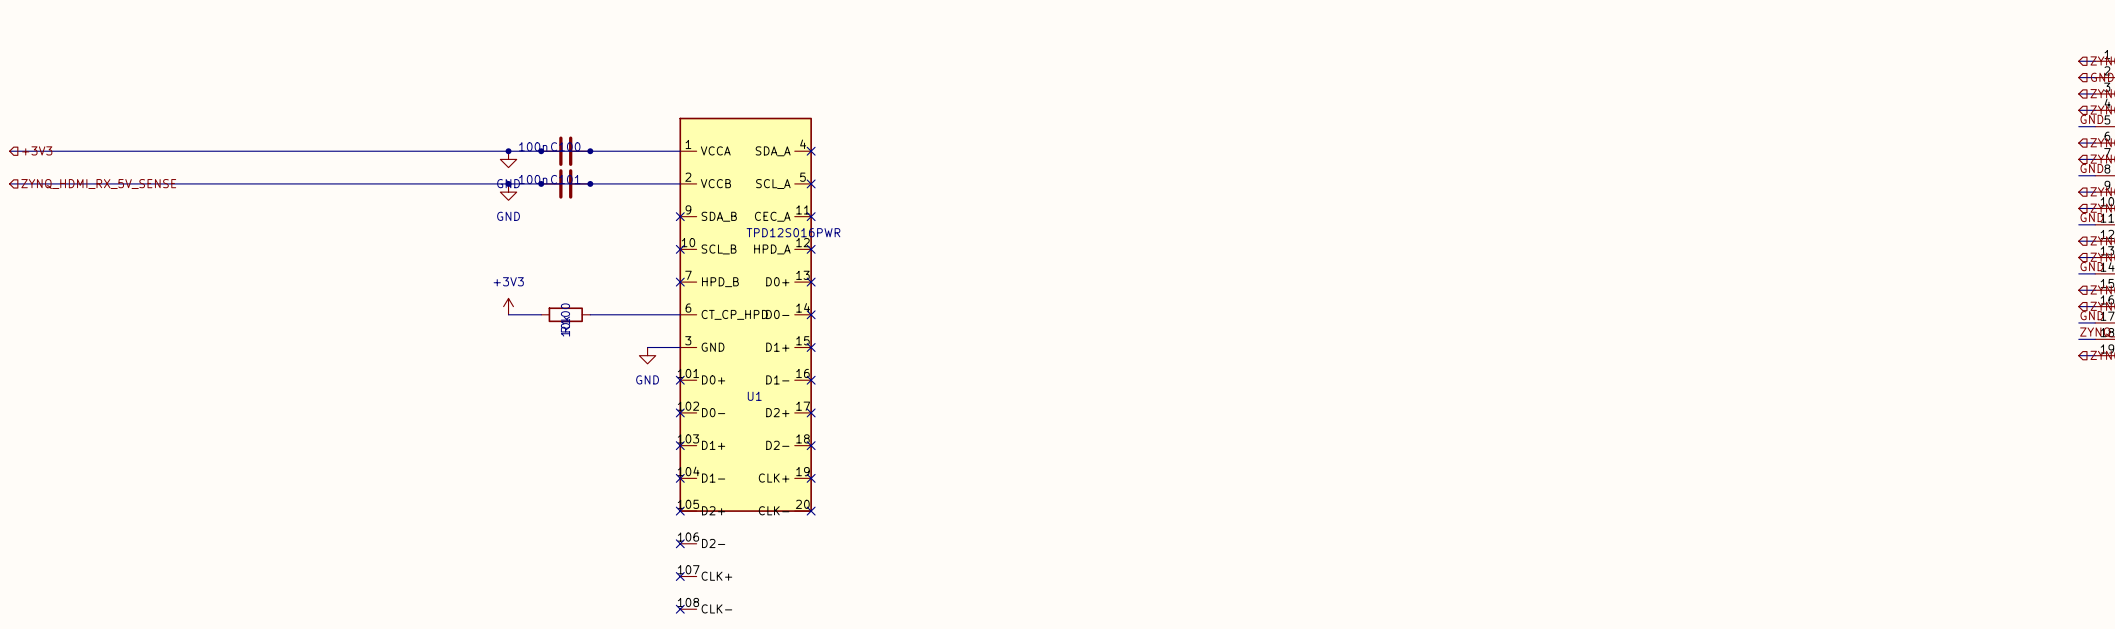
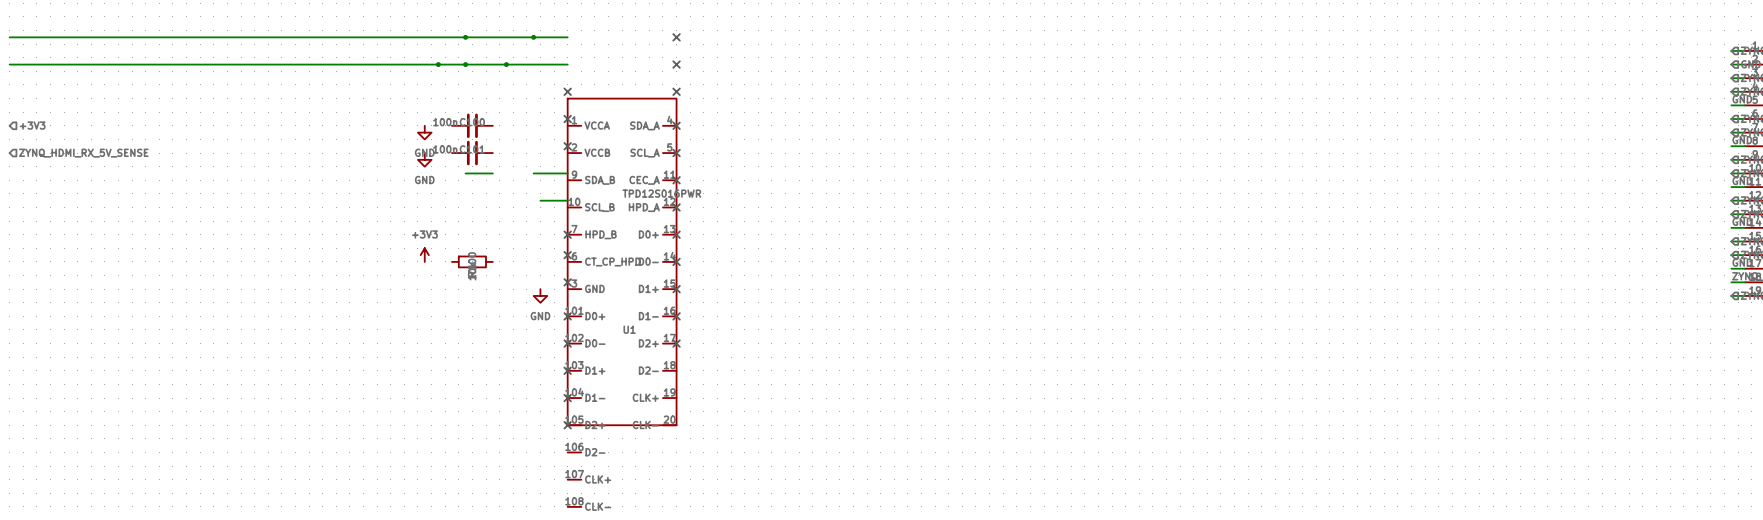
junction: none -> (465, 37)
junction: none -> (533, 37)
no-connect mark: none -> (676, 37)
junction: none -> (438, 64)
junction: none -> (465, 64)
junction: none -> (506, 64)
no-connect mark: none -> (676, 64)
no-connect mark: none -> (567, 91)
no-connect mark: none -> (676, 91)
no-connect mark: none -> (567, 119)
wire: (9, 151) (680, 151) -> (9, 37) (567, 37)
junction: (508, 151) -> none
junction: (541, 151) -> none
junction: (590, 151) -> none
no-connect mark: none -> (567, 146)
wire: (9, 183) (680, 183) -> (9, 64) (567, 64)
junction: (508, 183) -> none
junction: (541, 183) -> none
junction: (590, 183) -> none
wire: none -> (533, 173) (567, 173)
no-connect mark: (680, 216) -> none
no-connect mark: (680, 249) -> none
no-connect mark: none -> (567, 255)
wire: (508, 314) (541, 314) -> (465, 173) (492, 173)
wire: (590, 314) (680, 314) -> none
no-connect mark: none -> (567, 282)
wire: (647, 347) (680, 347) -> (540, 200) (567, 200)
no-connect mark: (811, 445) -> none
no-connect mark: (811, 478) -> none
no-connect mark: (811, 511) -> none
no-connect mark: (680, 543) -> none
no-connect mark: (680, 576) -> none
no-connect mark: (680, 609) -> none

